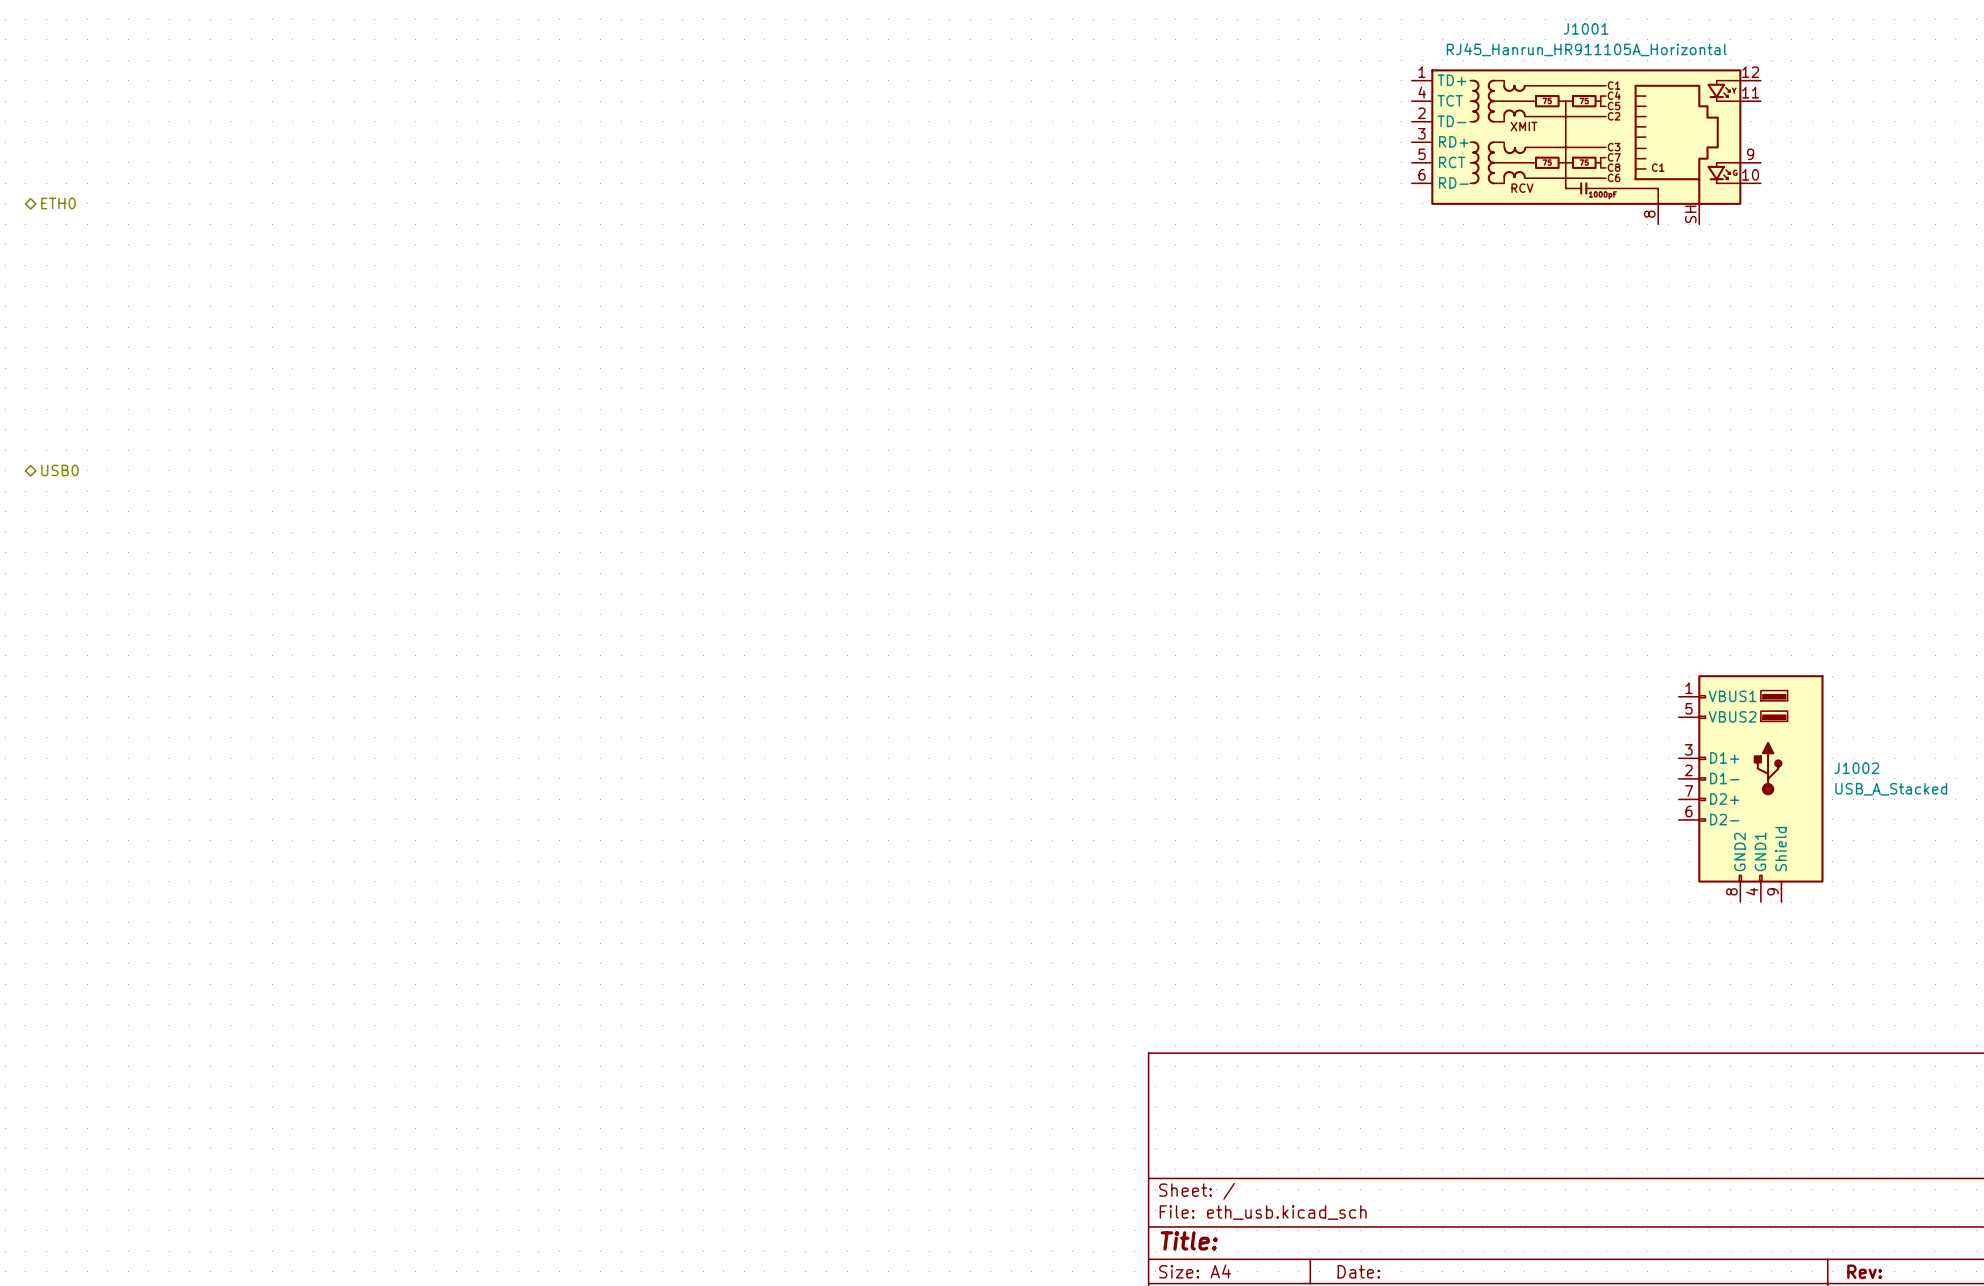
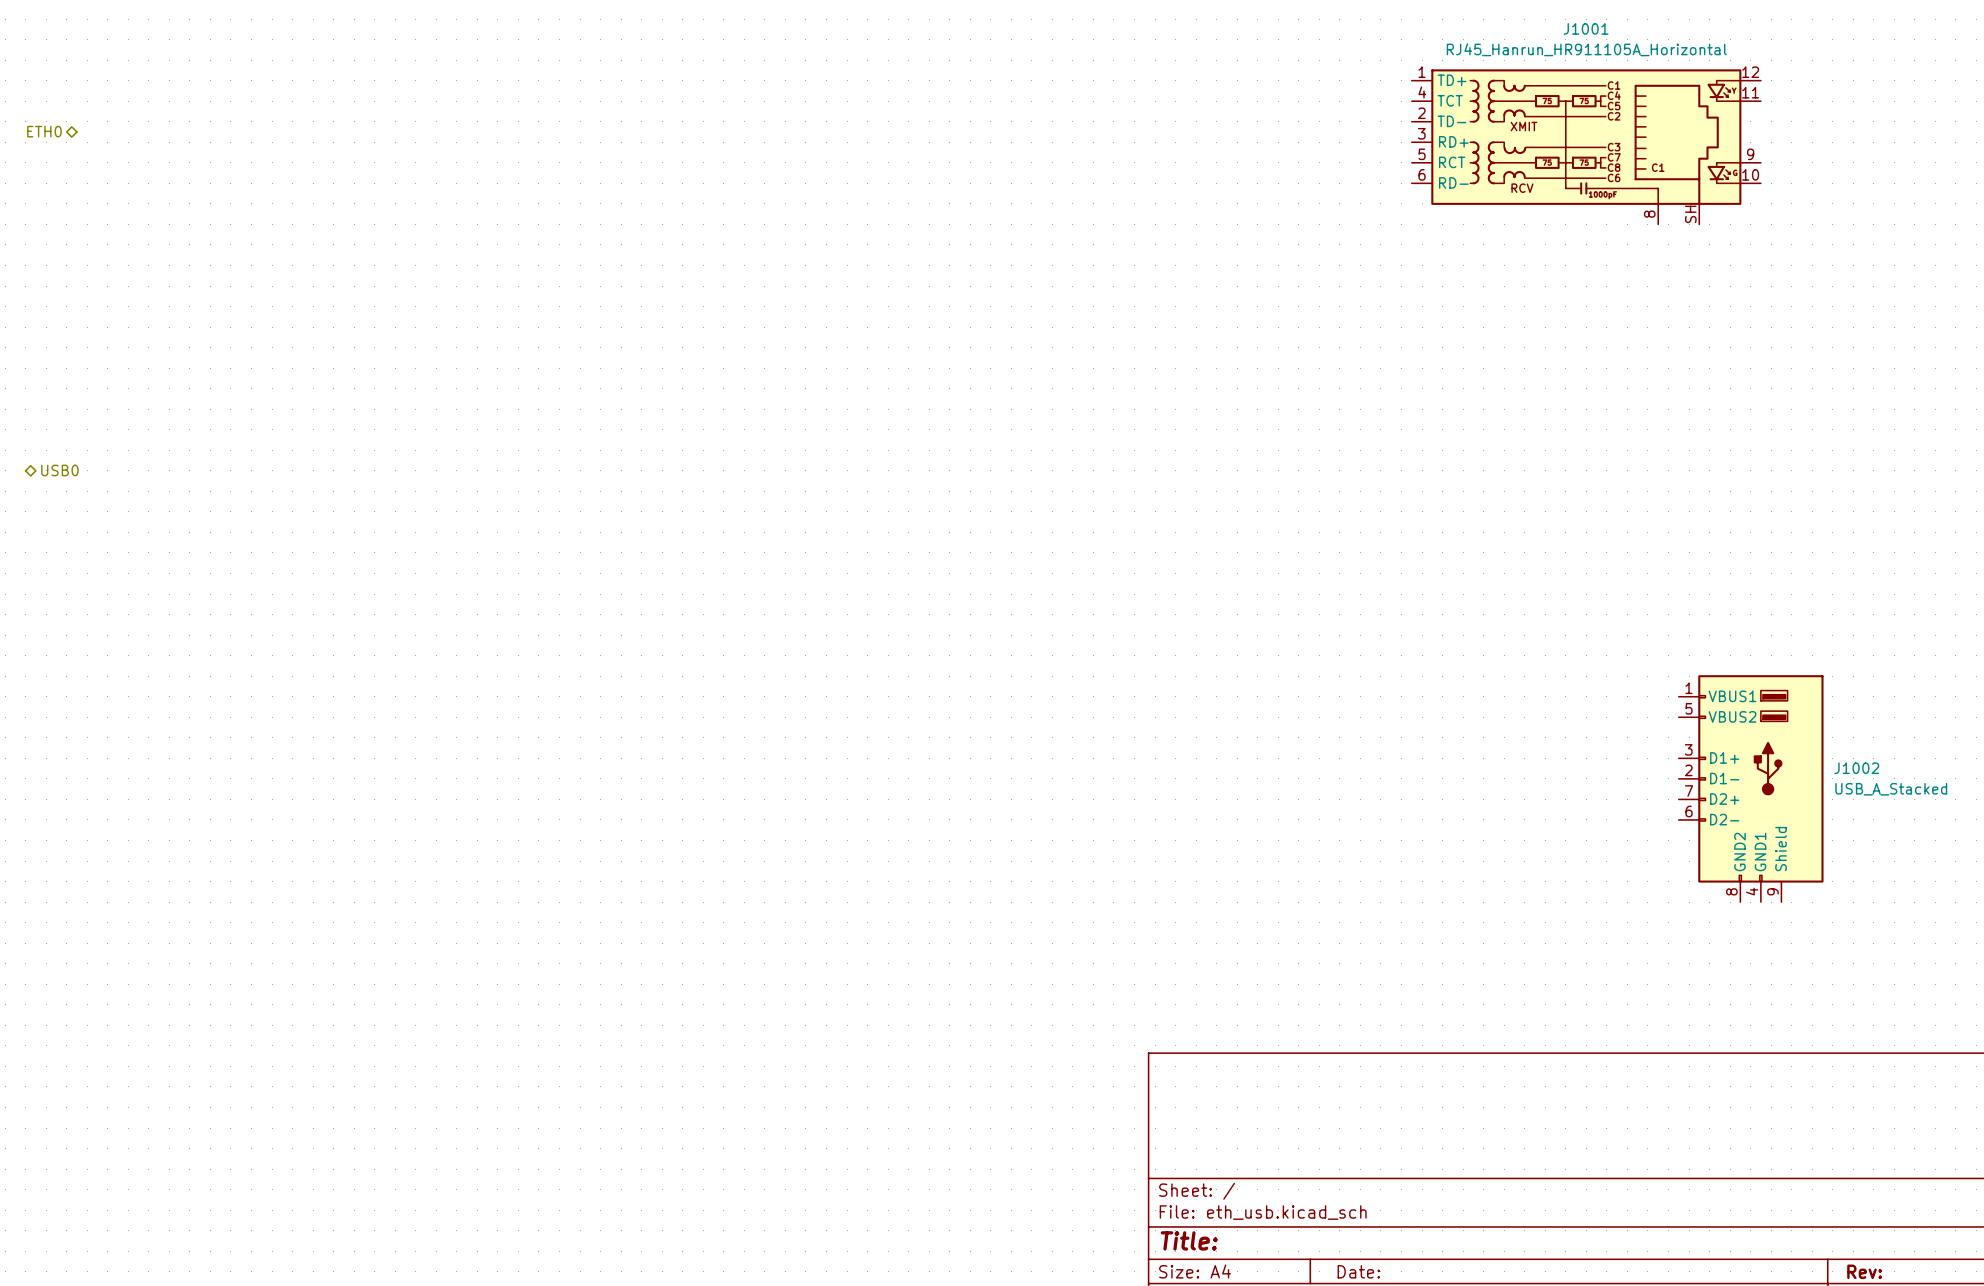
hierarchical label rotation: 0° (58, 203) -> 180° (44, 131)
hierarchical label position: ETH0 (58, 203) -> ETH0 (44, 131)

